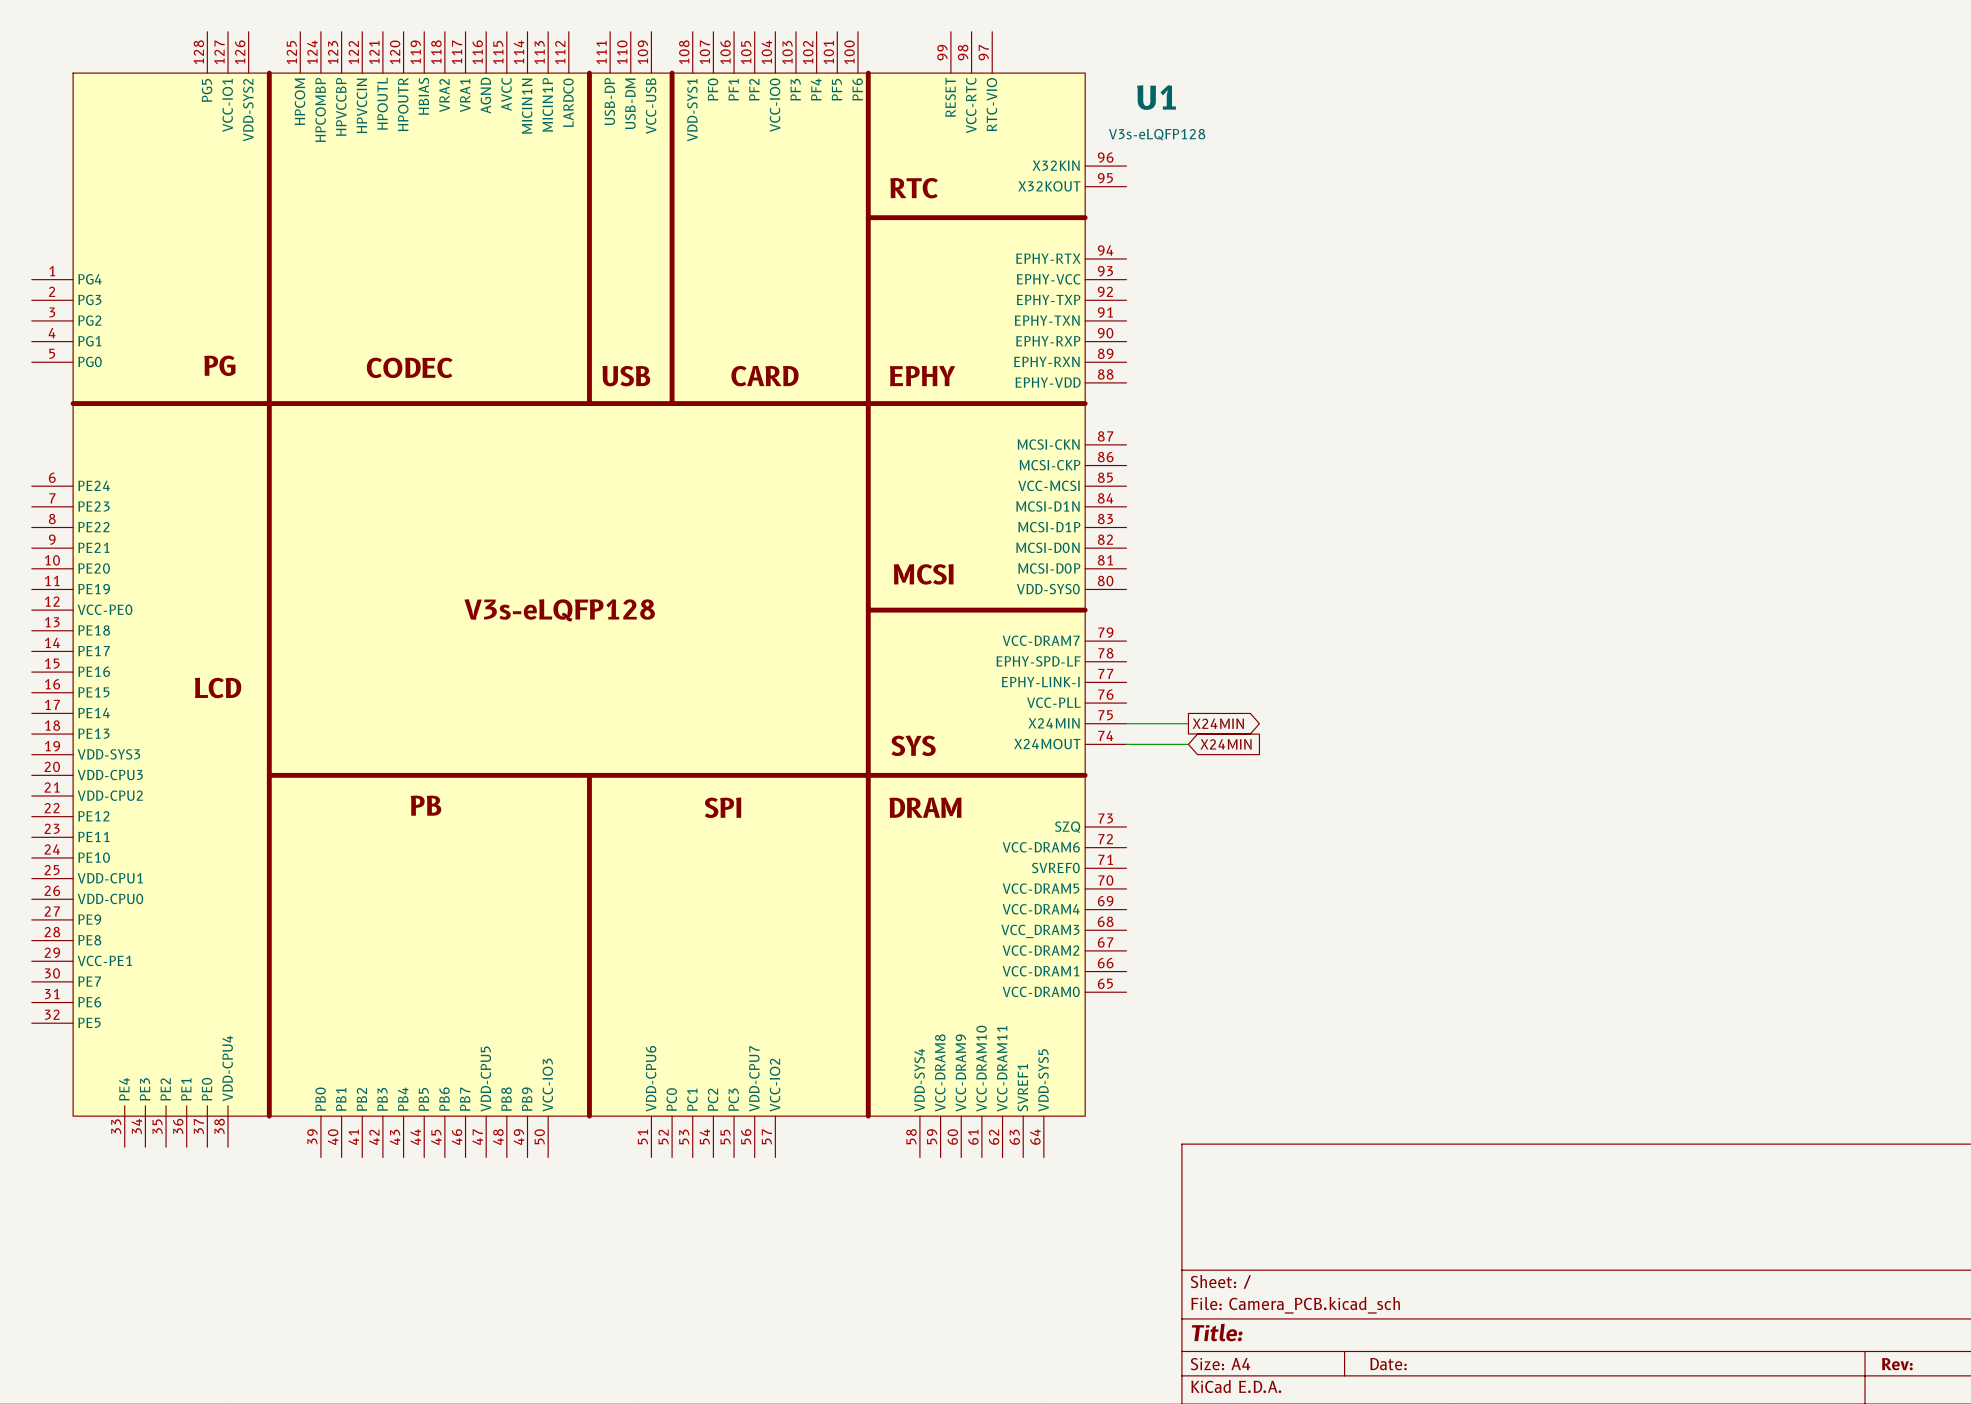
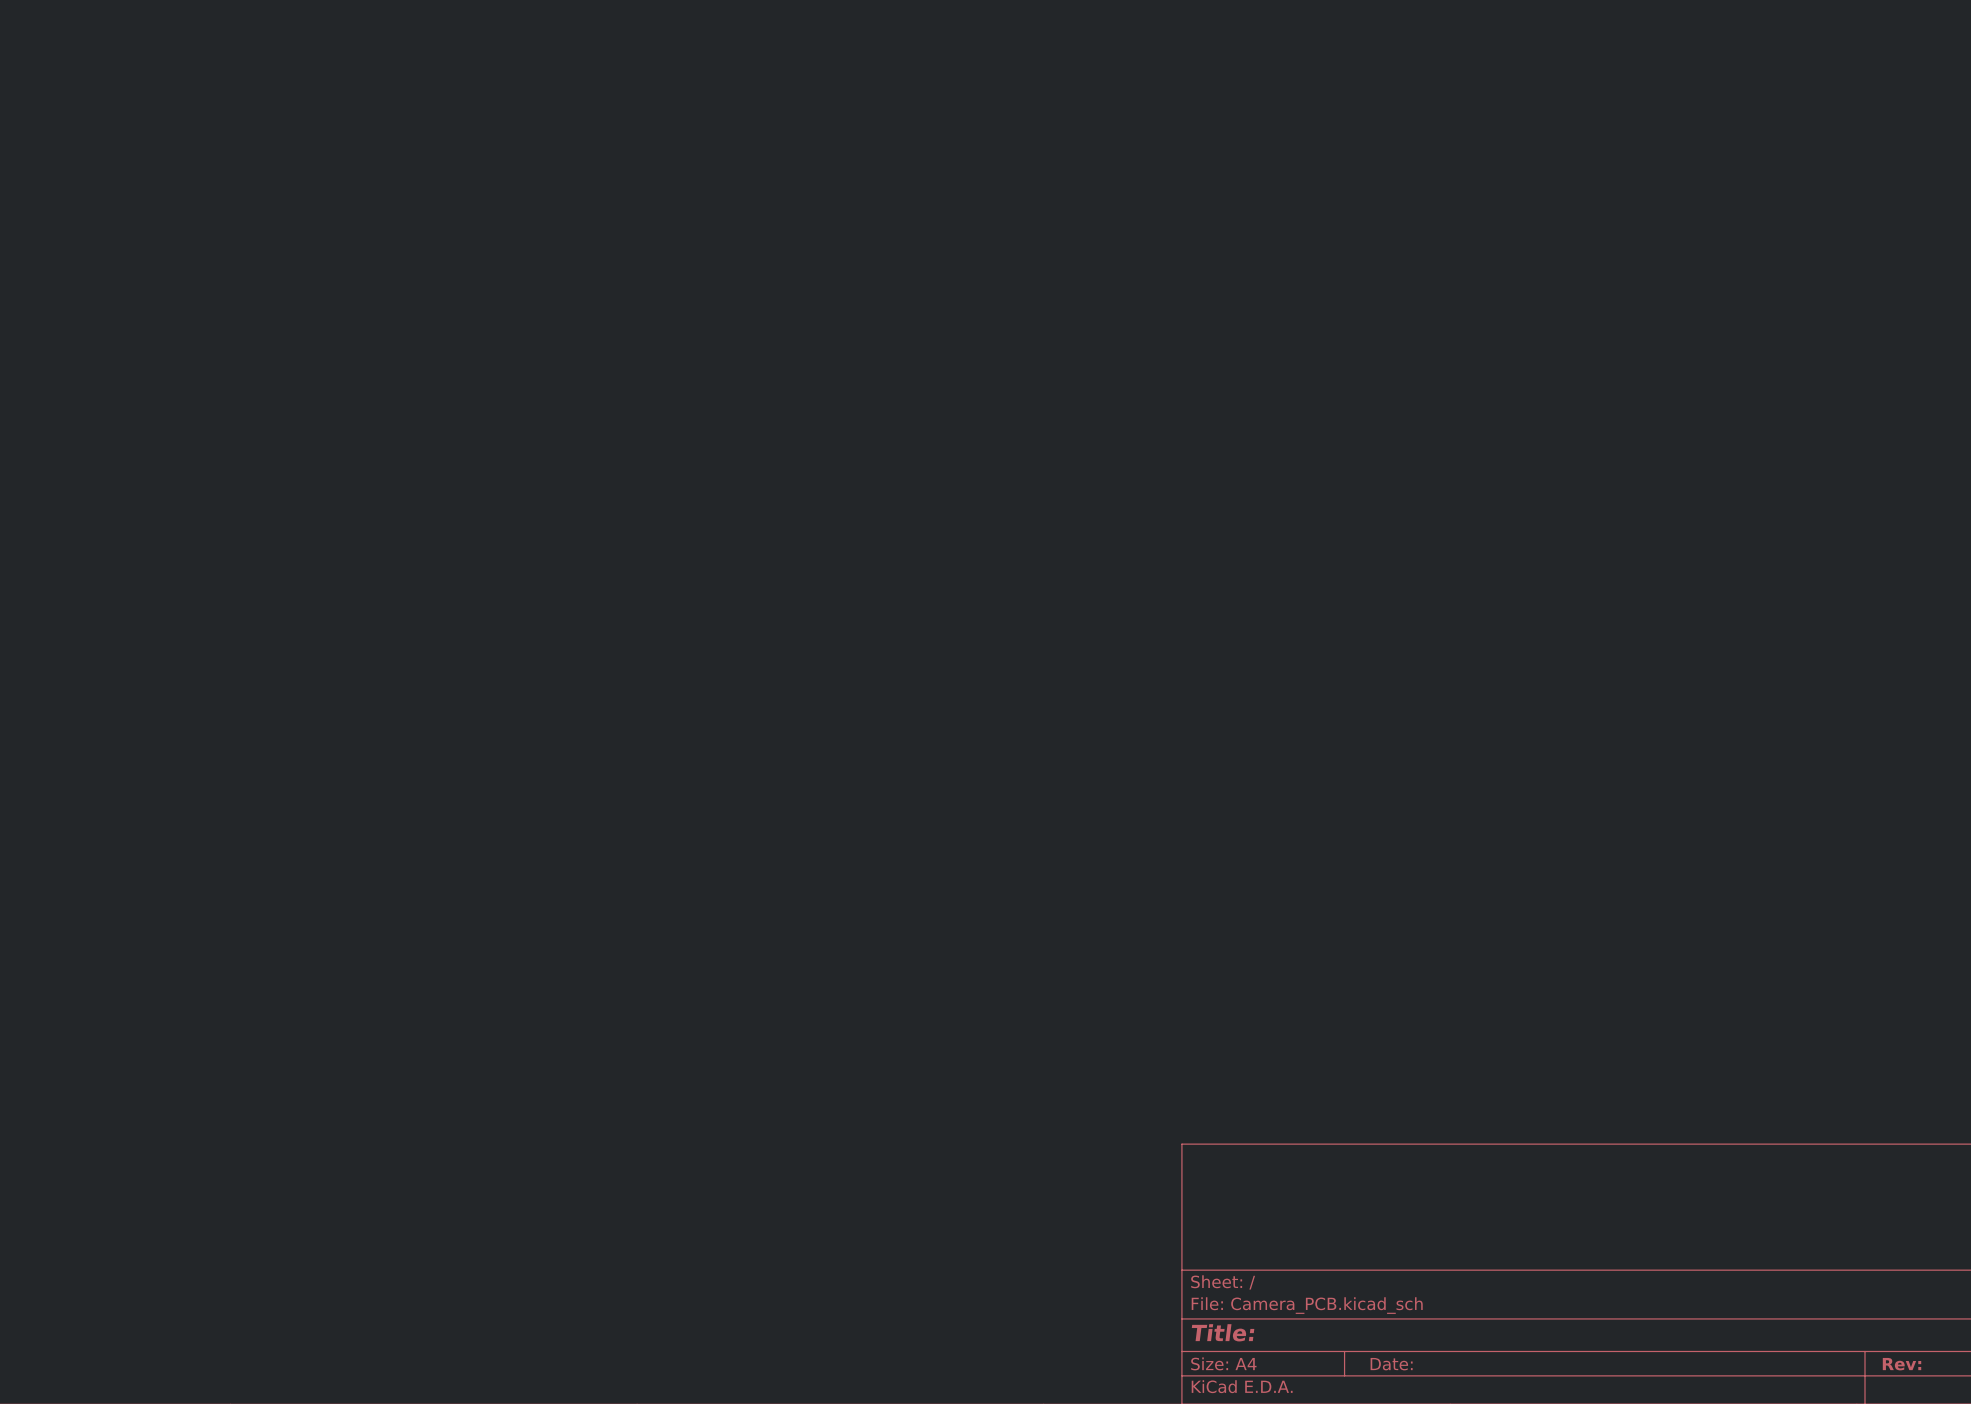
U1: V3s-eLQFP128 (579, 594) -> none
wire: (1126, 723) (1188, 723) -> none
global label: X24MIN (1218, 723) -> none
wire: (1126, 744) (1188, 744) -> none
global label: X24MIN (1226, 744) -> none

